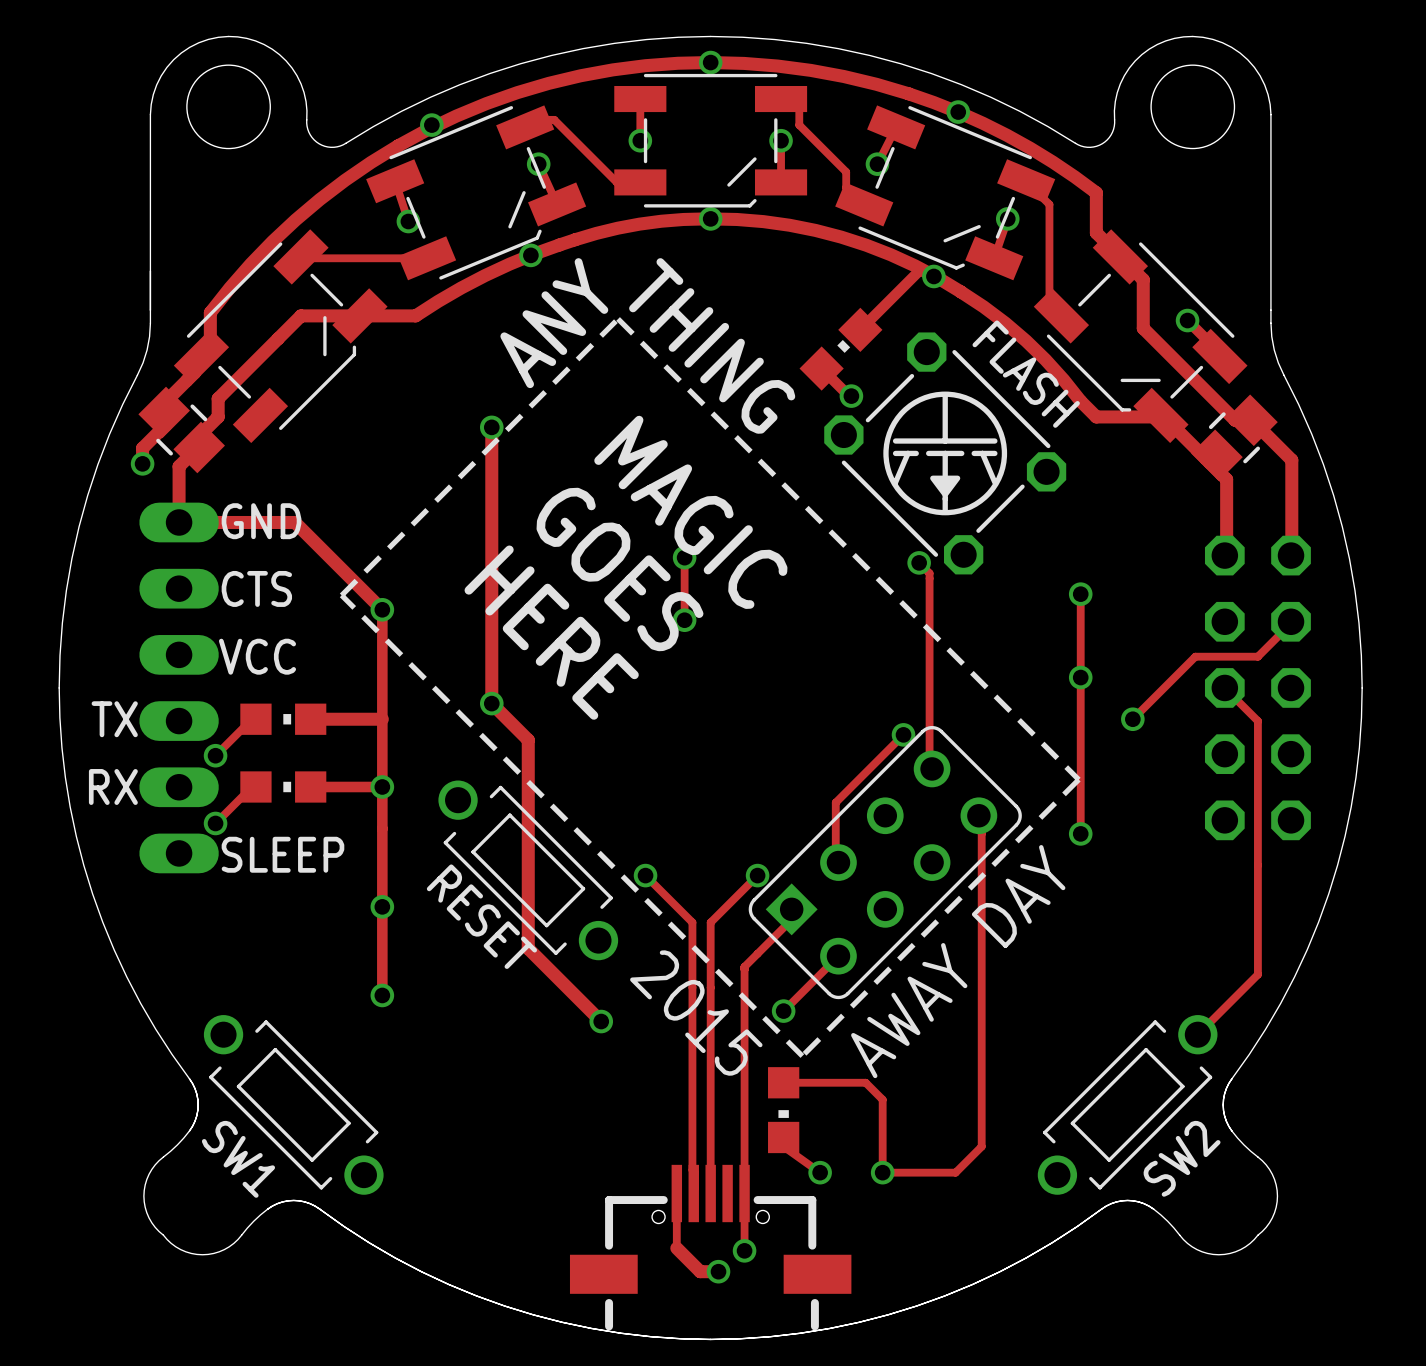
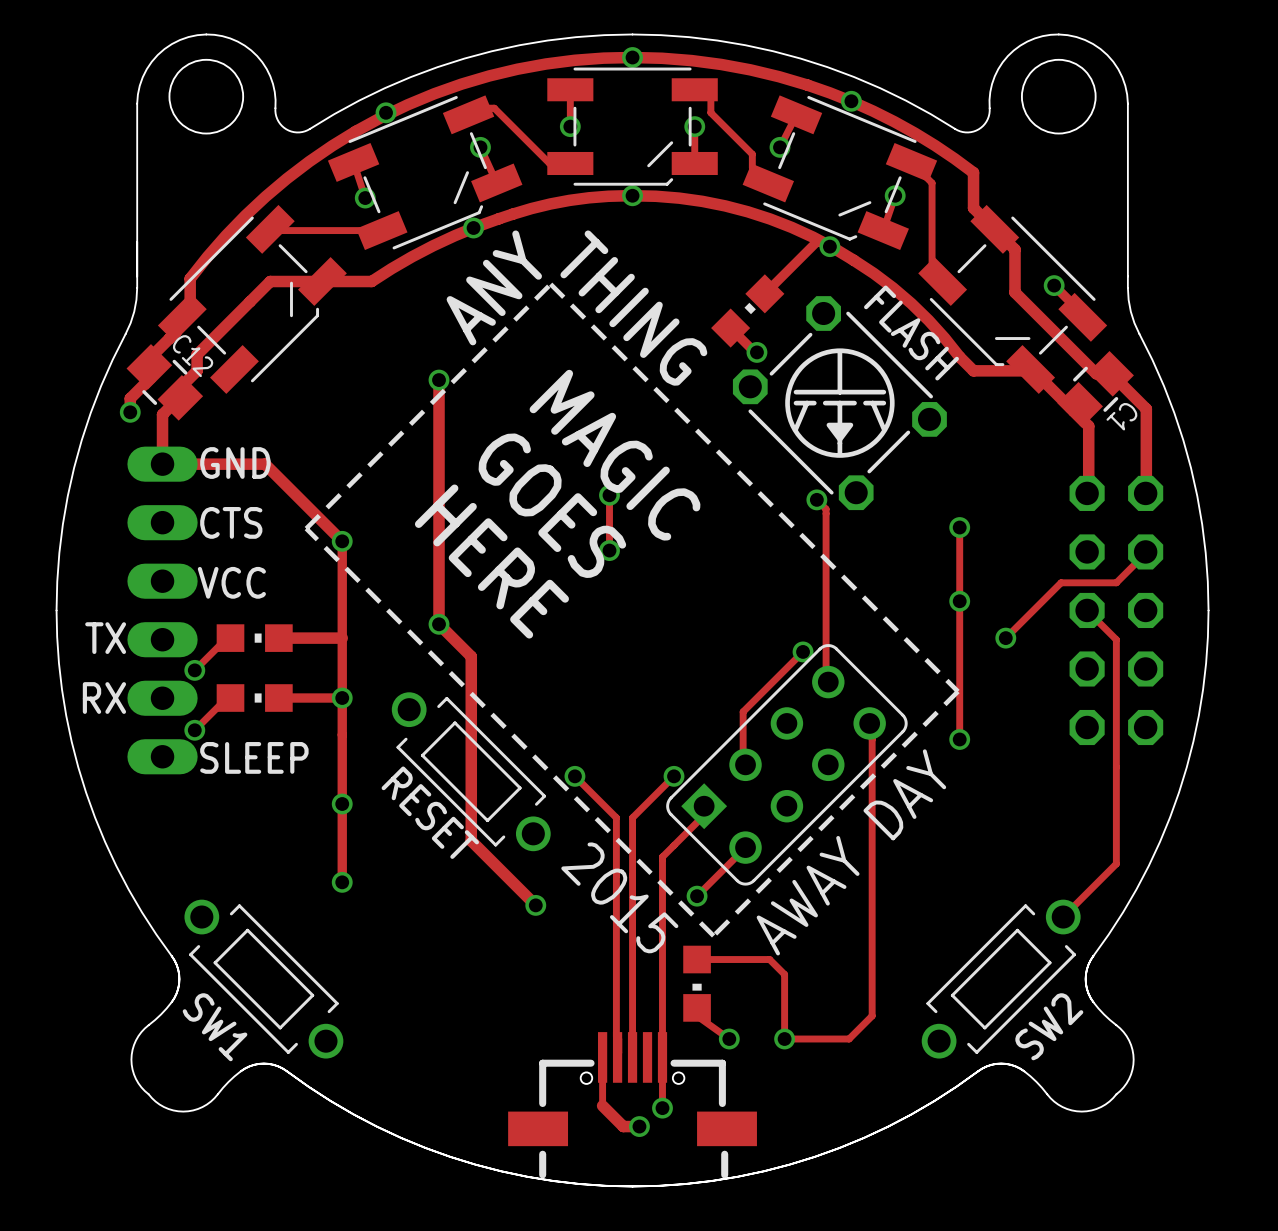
C12 name: none -> C12 (193, 356)
C1 name: none -> C1 (1121, 416)

